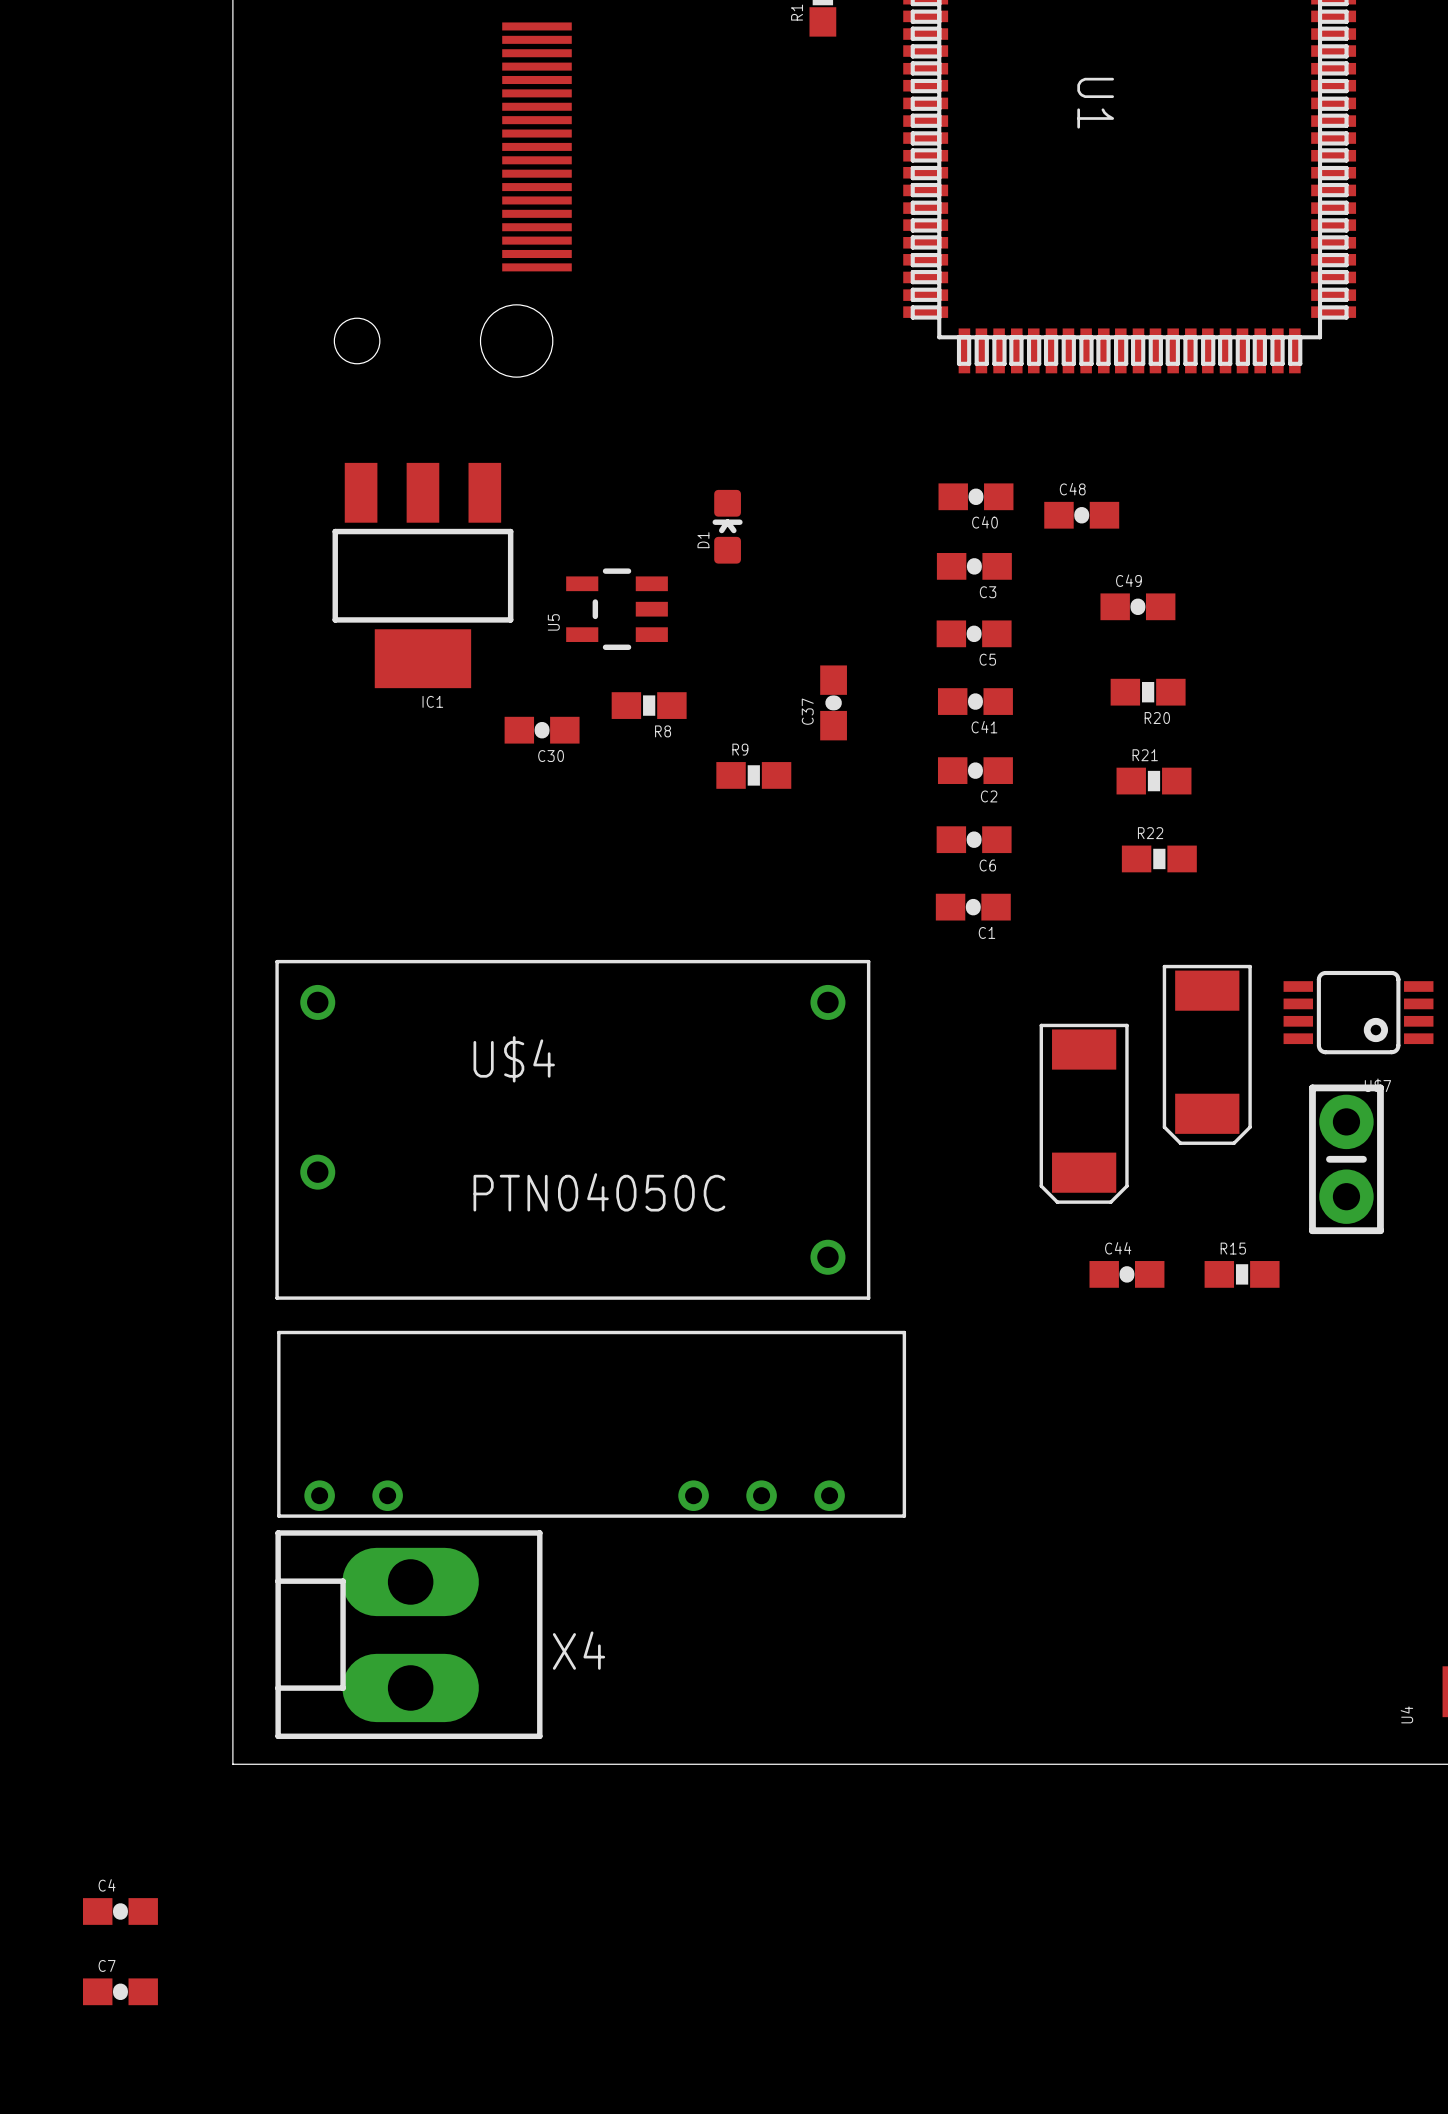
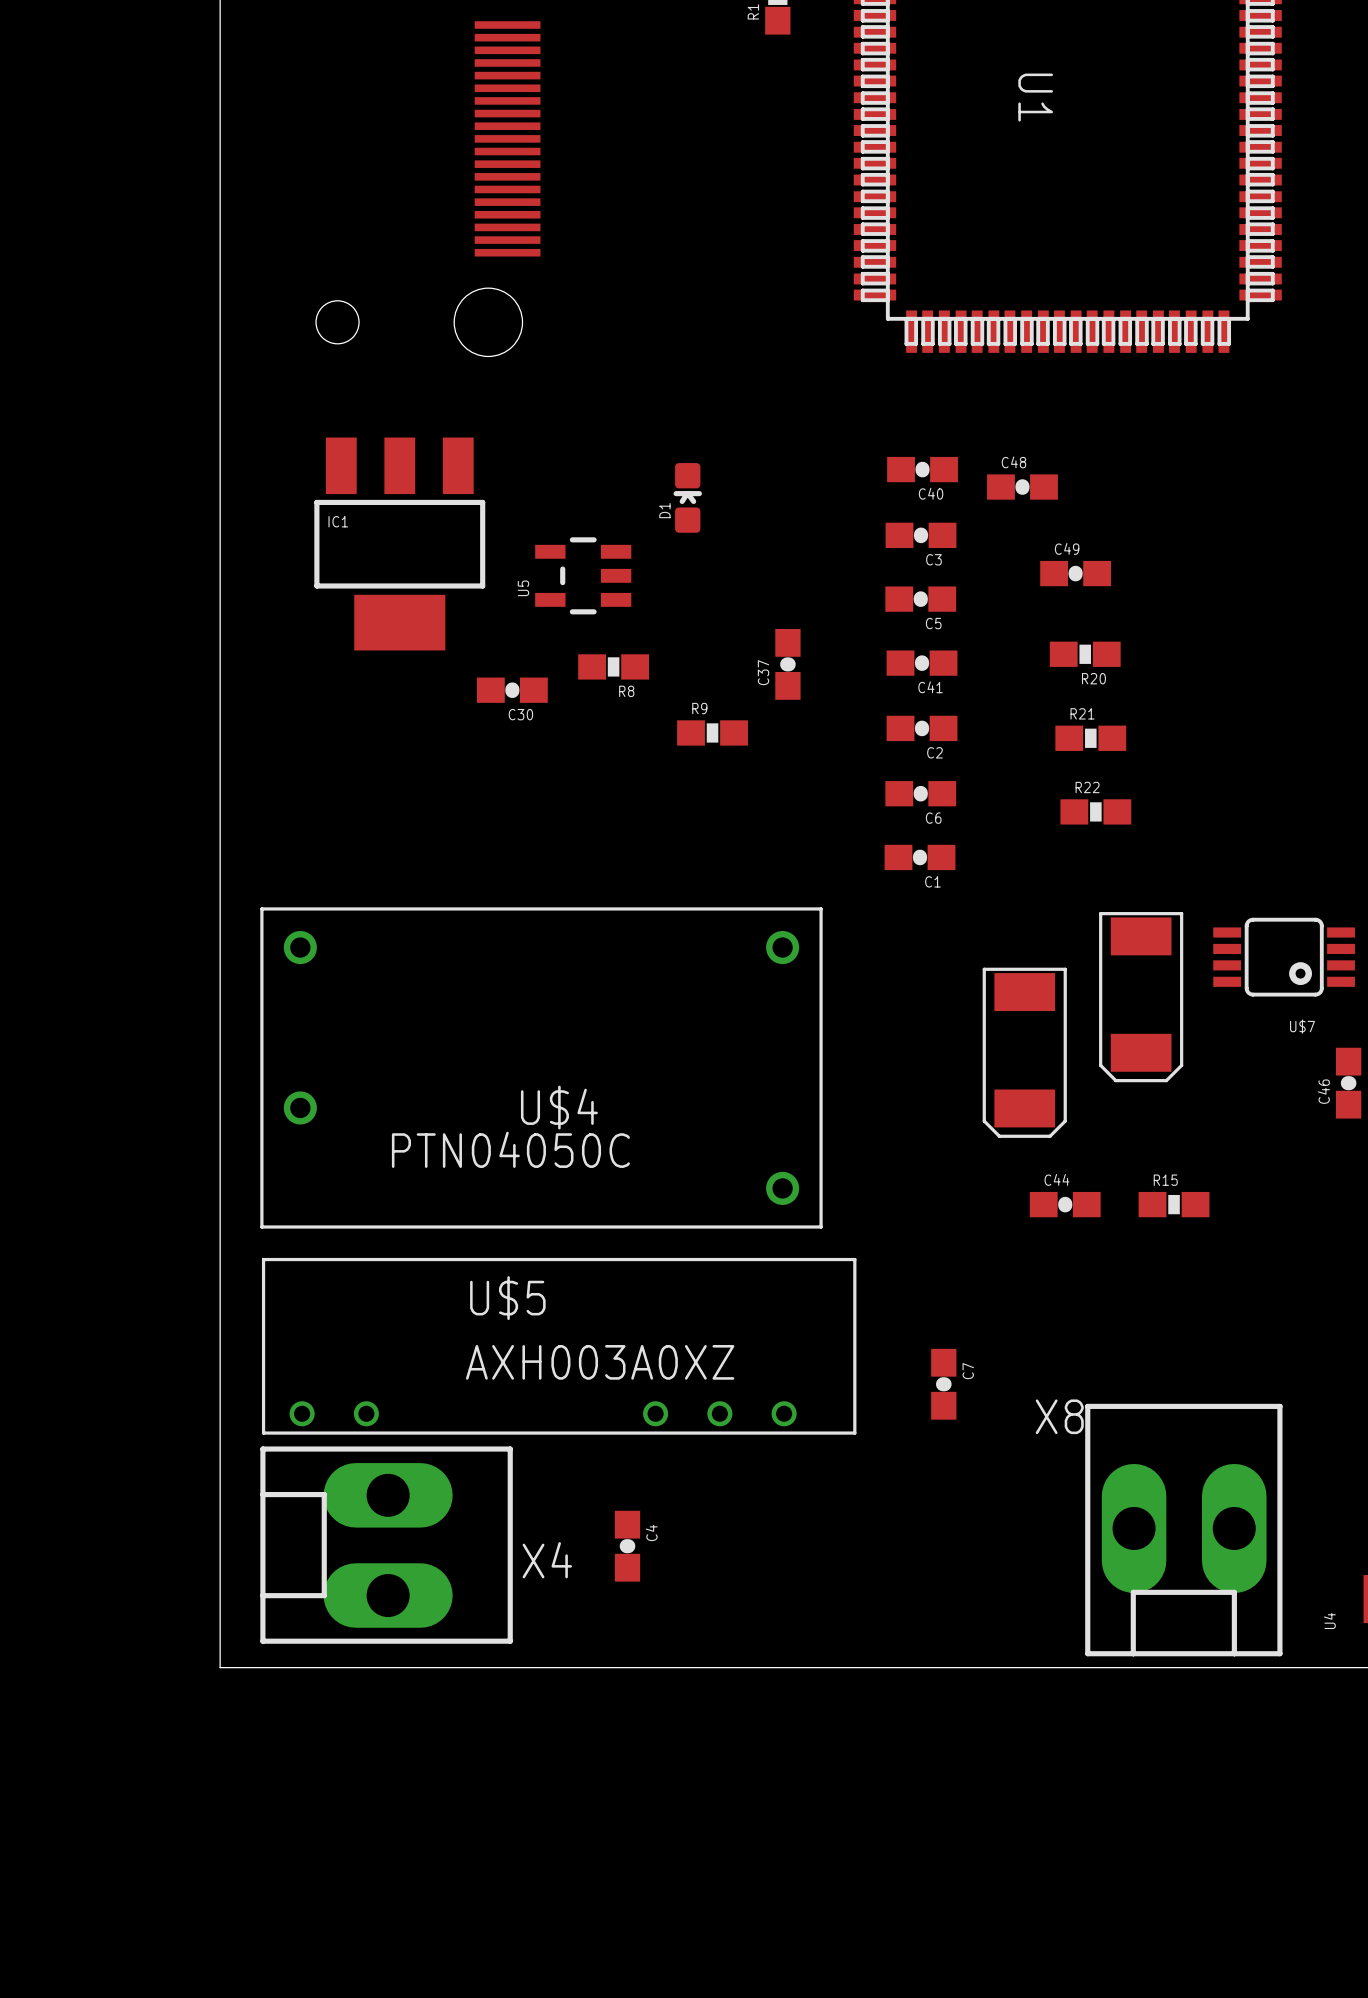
IC1 name position: IC1 (432, 701) -> IC1 (338, 521)
U$4 name position: U$4 (514, 1059) -> U$4 (559, 1107)
C46: none -> (1348, 1083)
part: (1346, 1159) -> none
U$4 value position: PTN04050C (599, 1192) -> PTN04050C (510, 1149)
part: (591, 1424) -> none
U$5: none -> AXH003A0XZ (559, 1346)
X8: none -> (1183, 1530)
C4 rotation: 0° (120, 1911) -> 90° clockwise (627, 1546)
C4 position: (120, 1911) -> (627, 1546)
C7 rotation: 0° (120, 1991) -> 90° clockwise (943, 1384)
C7 position: (120, 1991) -> (943, 1384)

